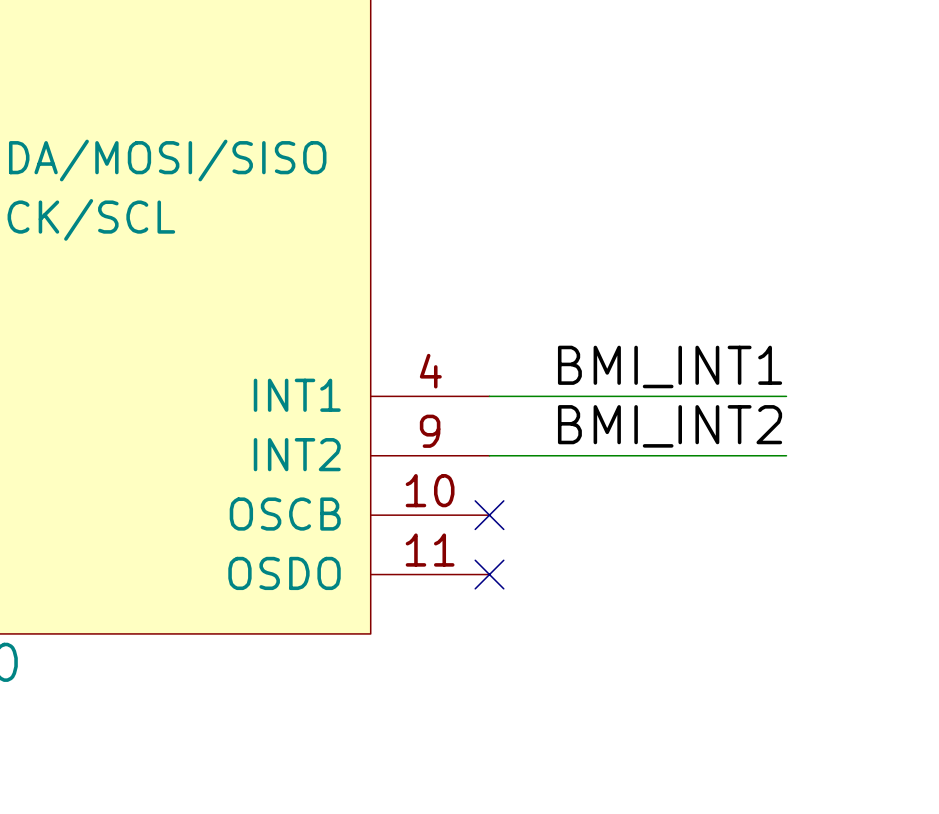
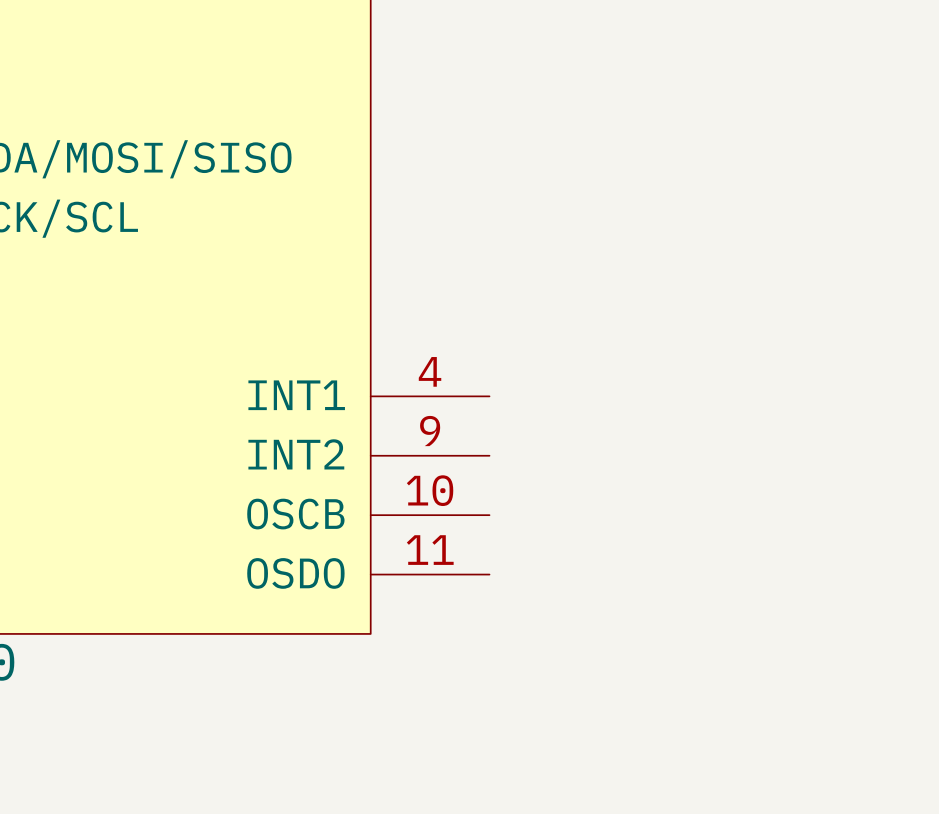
label: BMI_INT1 (670, 366) -> none
wire: (489, 396) (786, 396) -> none
label: BMI_INT2 (670, 426) -> none
wire: (489, 455) (786, 455) -> none
no-connect mark: (489, 515) -> none
no-connect mark: (489, 574) -> none

